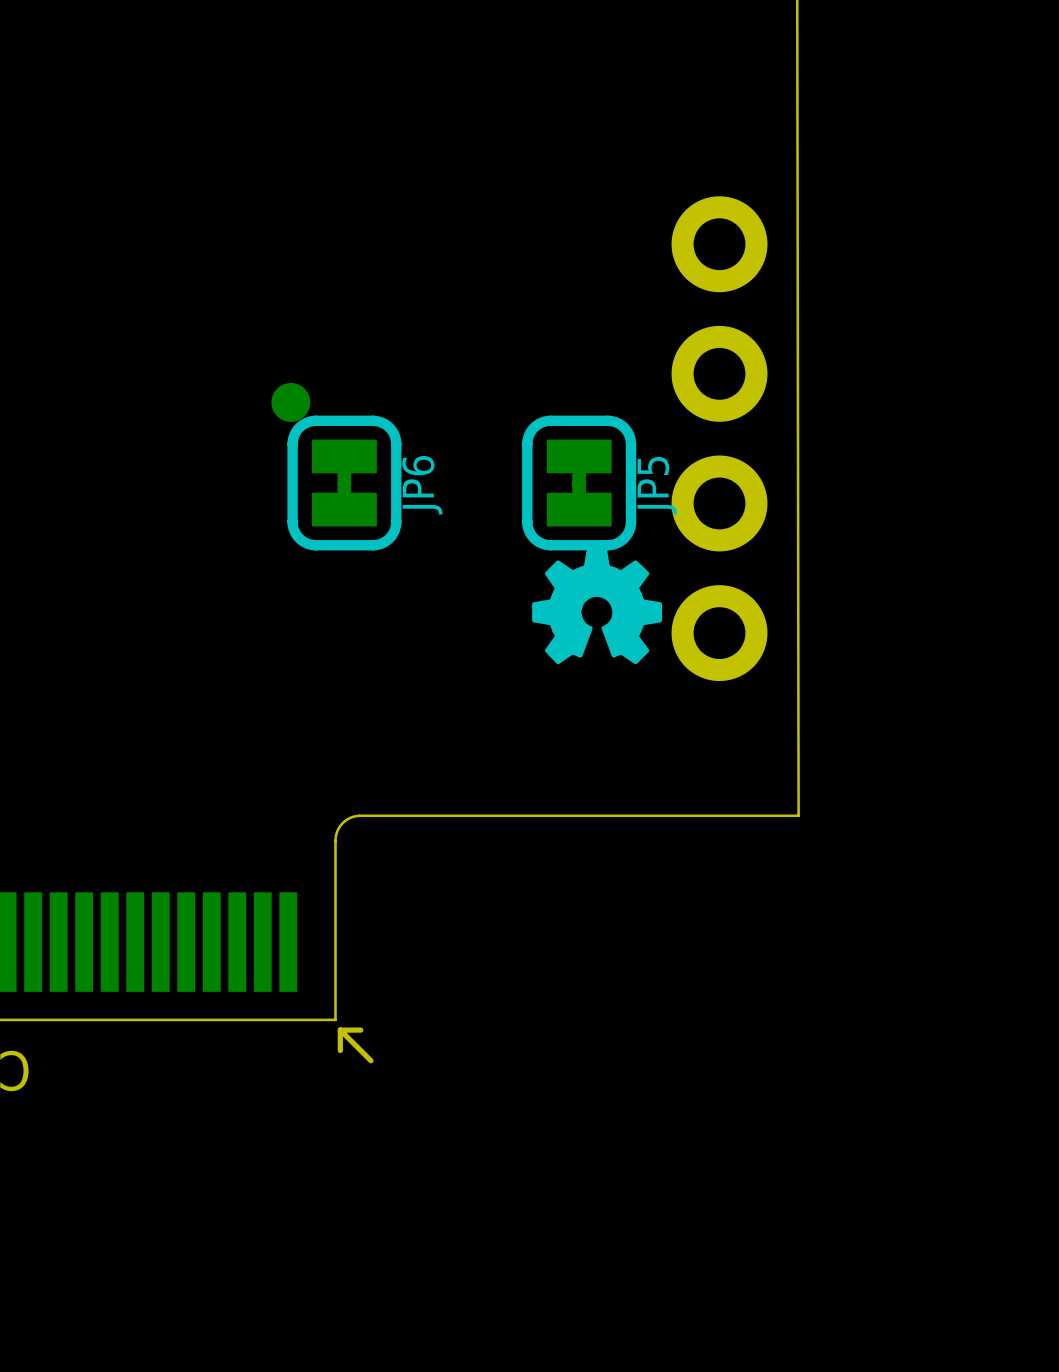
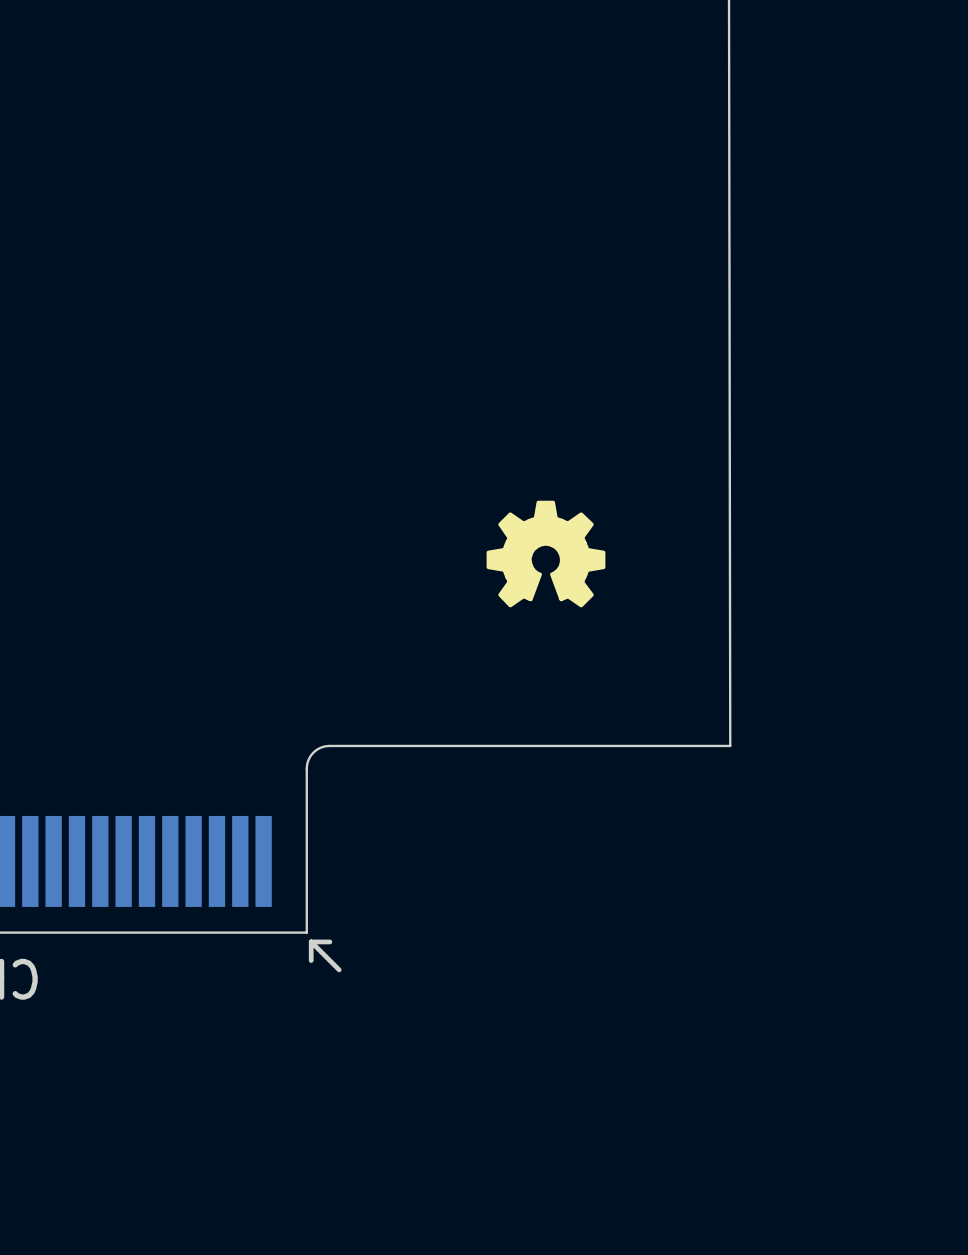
part: (290, 402) -> none
part: (719, 438) -> none
JP6: (344, 483) -> none
JP5: (579, 483) -> none

